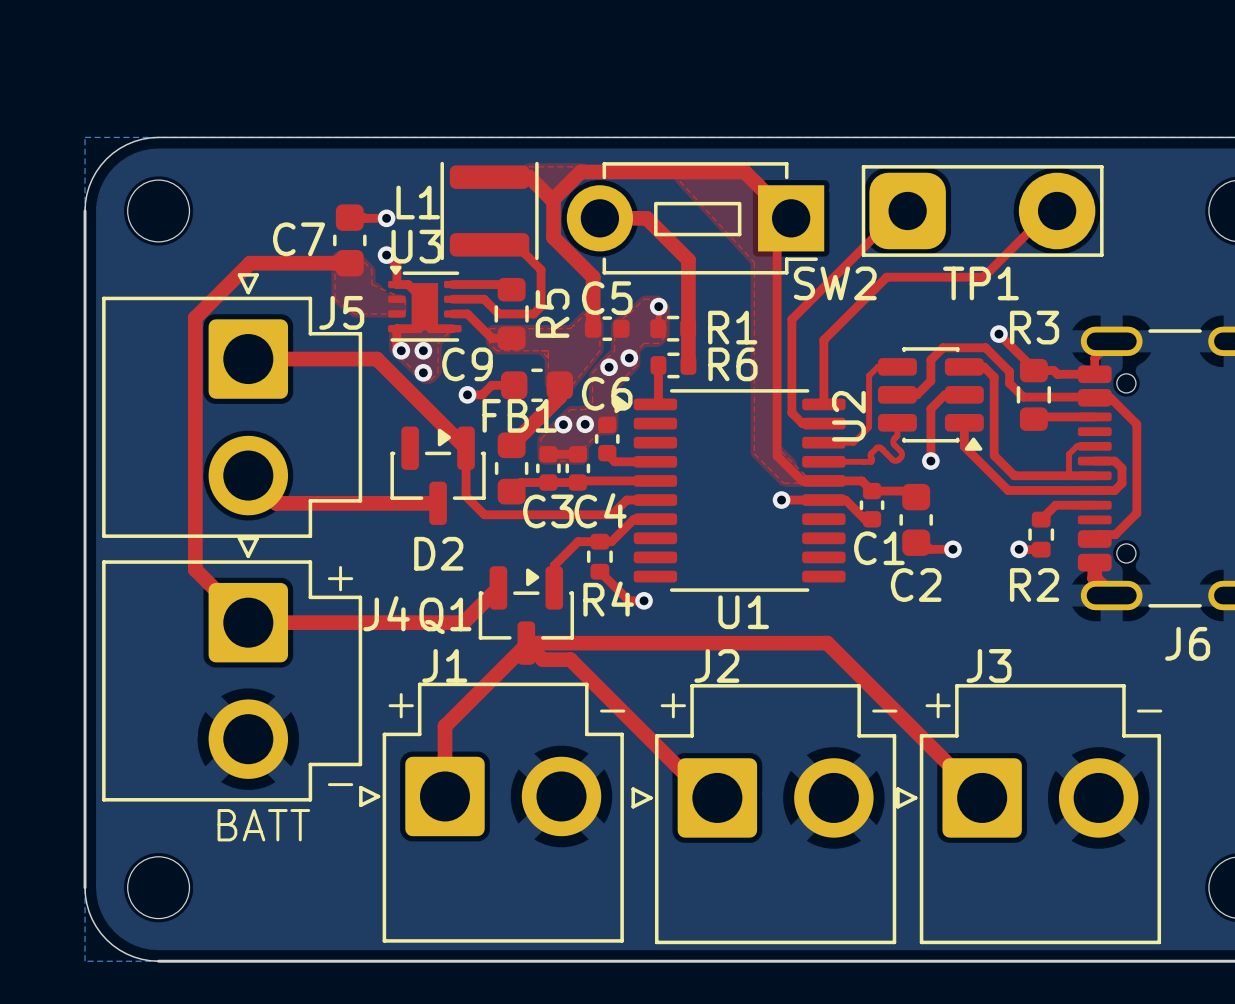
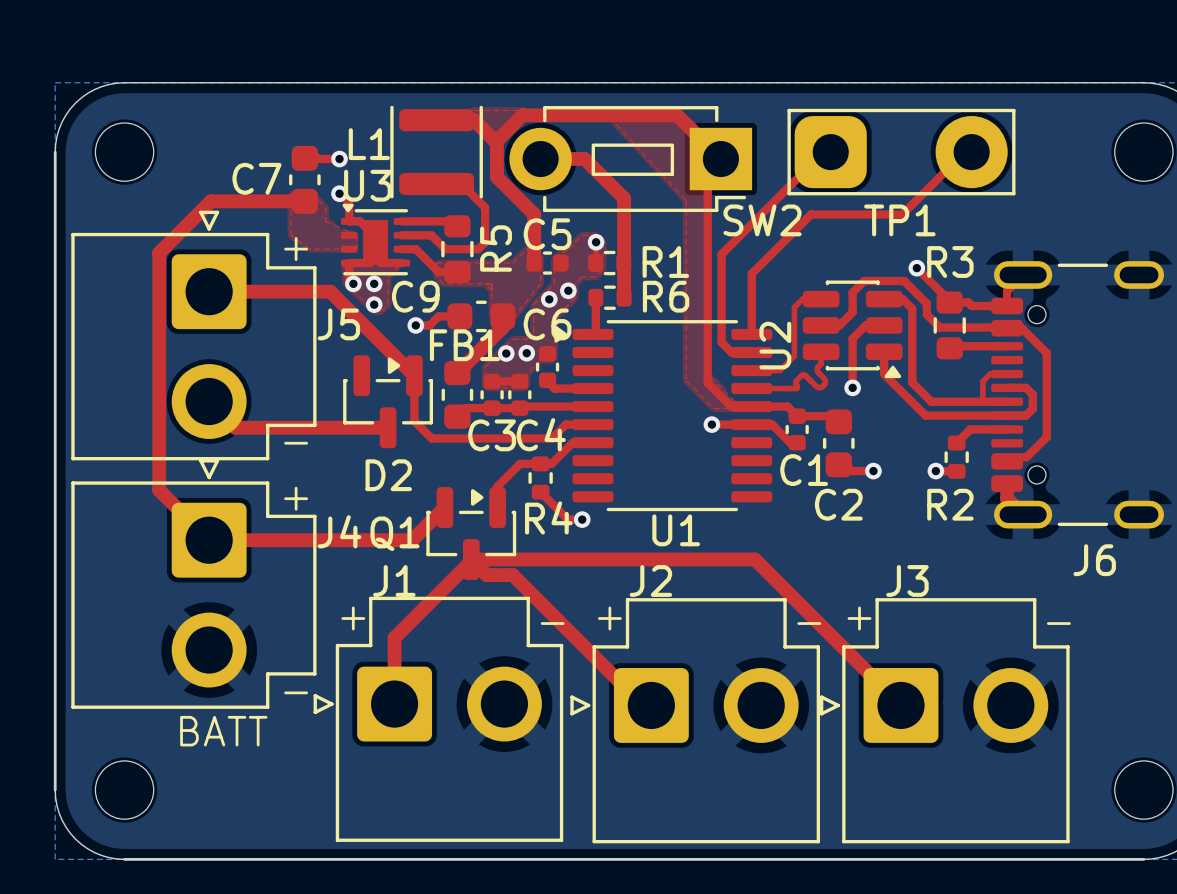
J5 name position: J5 (341, 312) -> J5 (338, 324)
text: none -> + (296, 249)
text: none -> - (296, 443)

